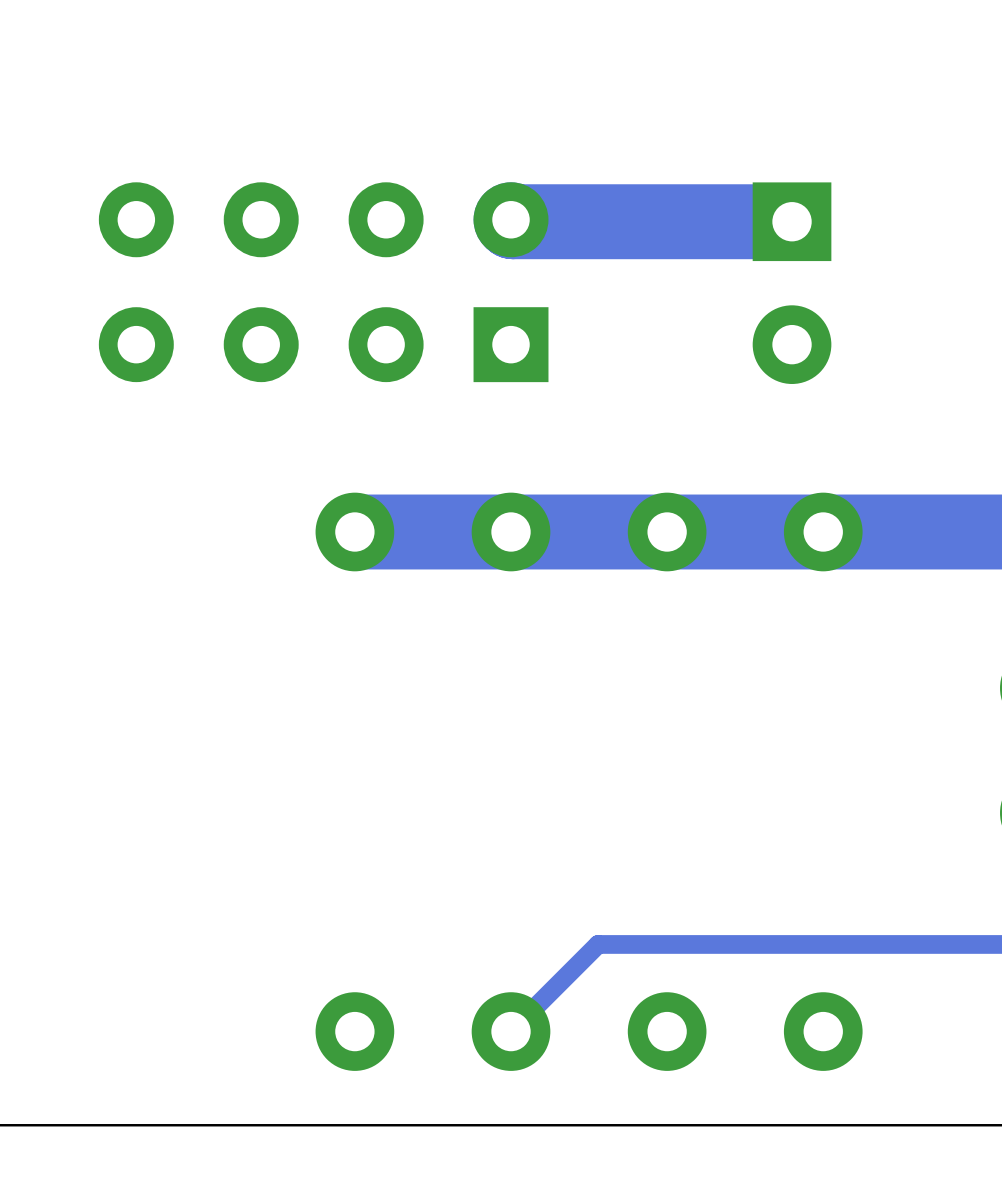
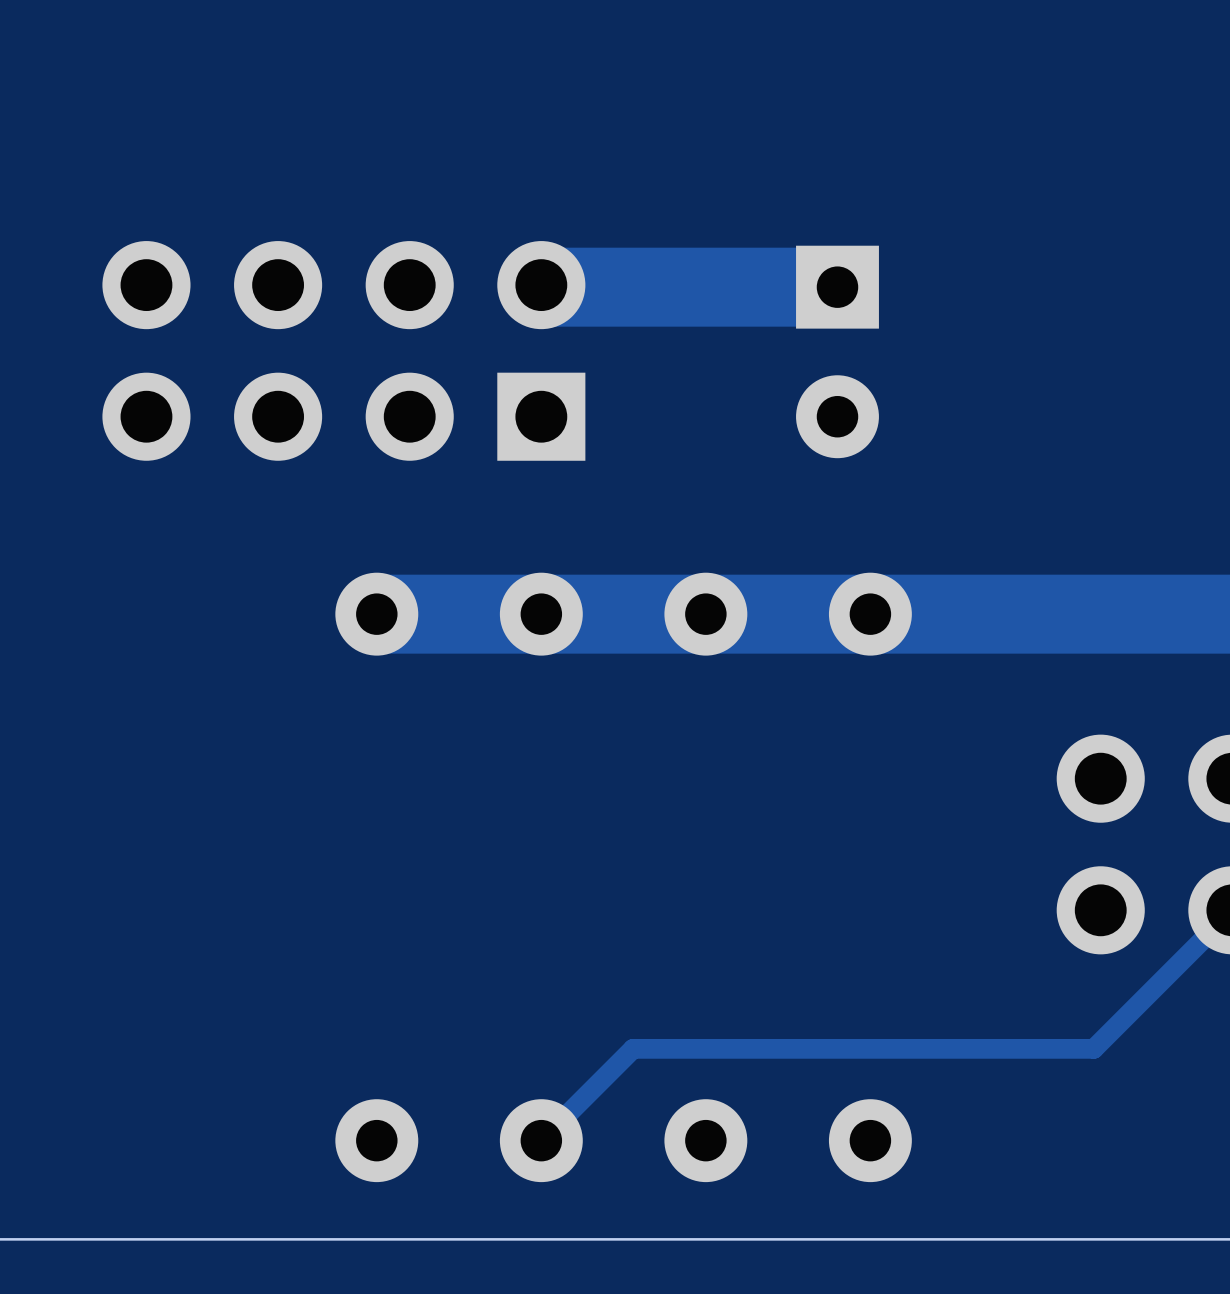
part footprint: [98, 182, 549, 383] -> [102, 241, 586, 461]

